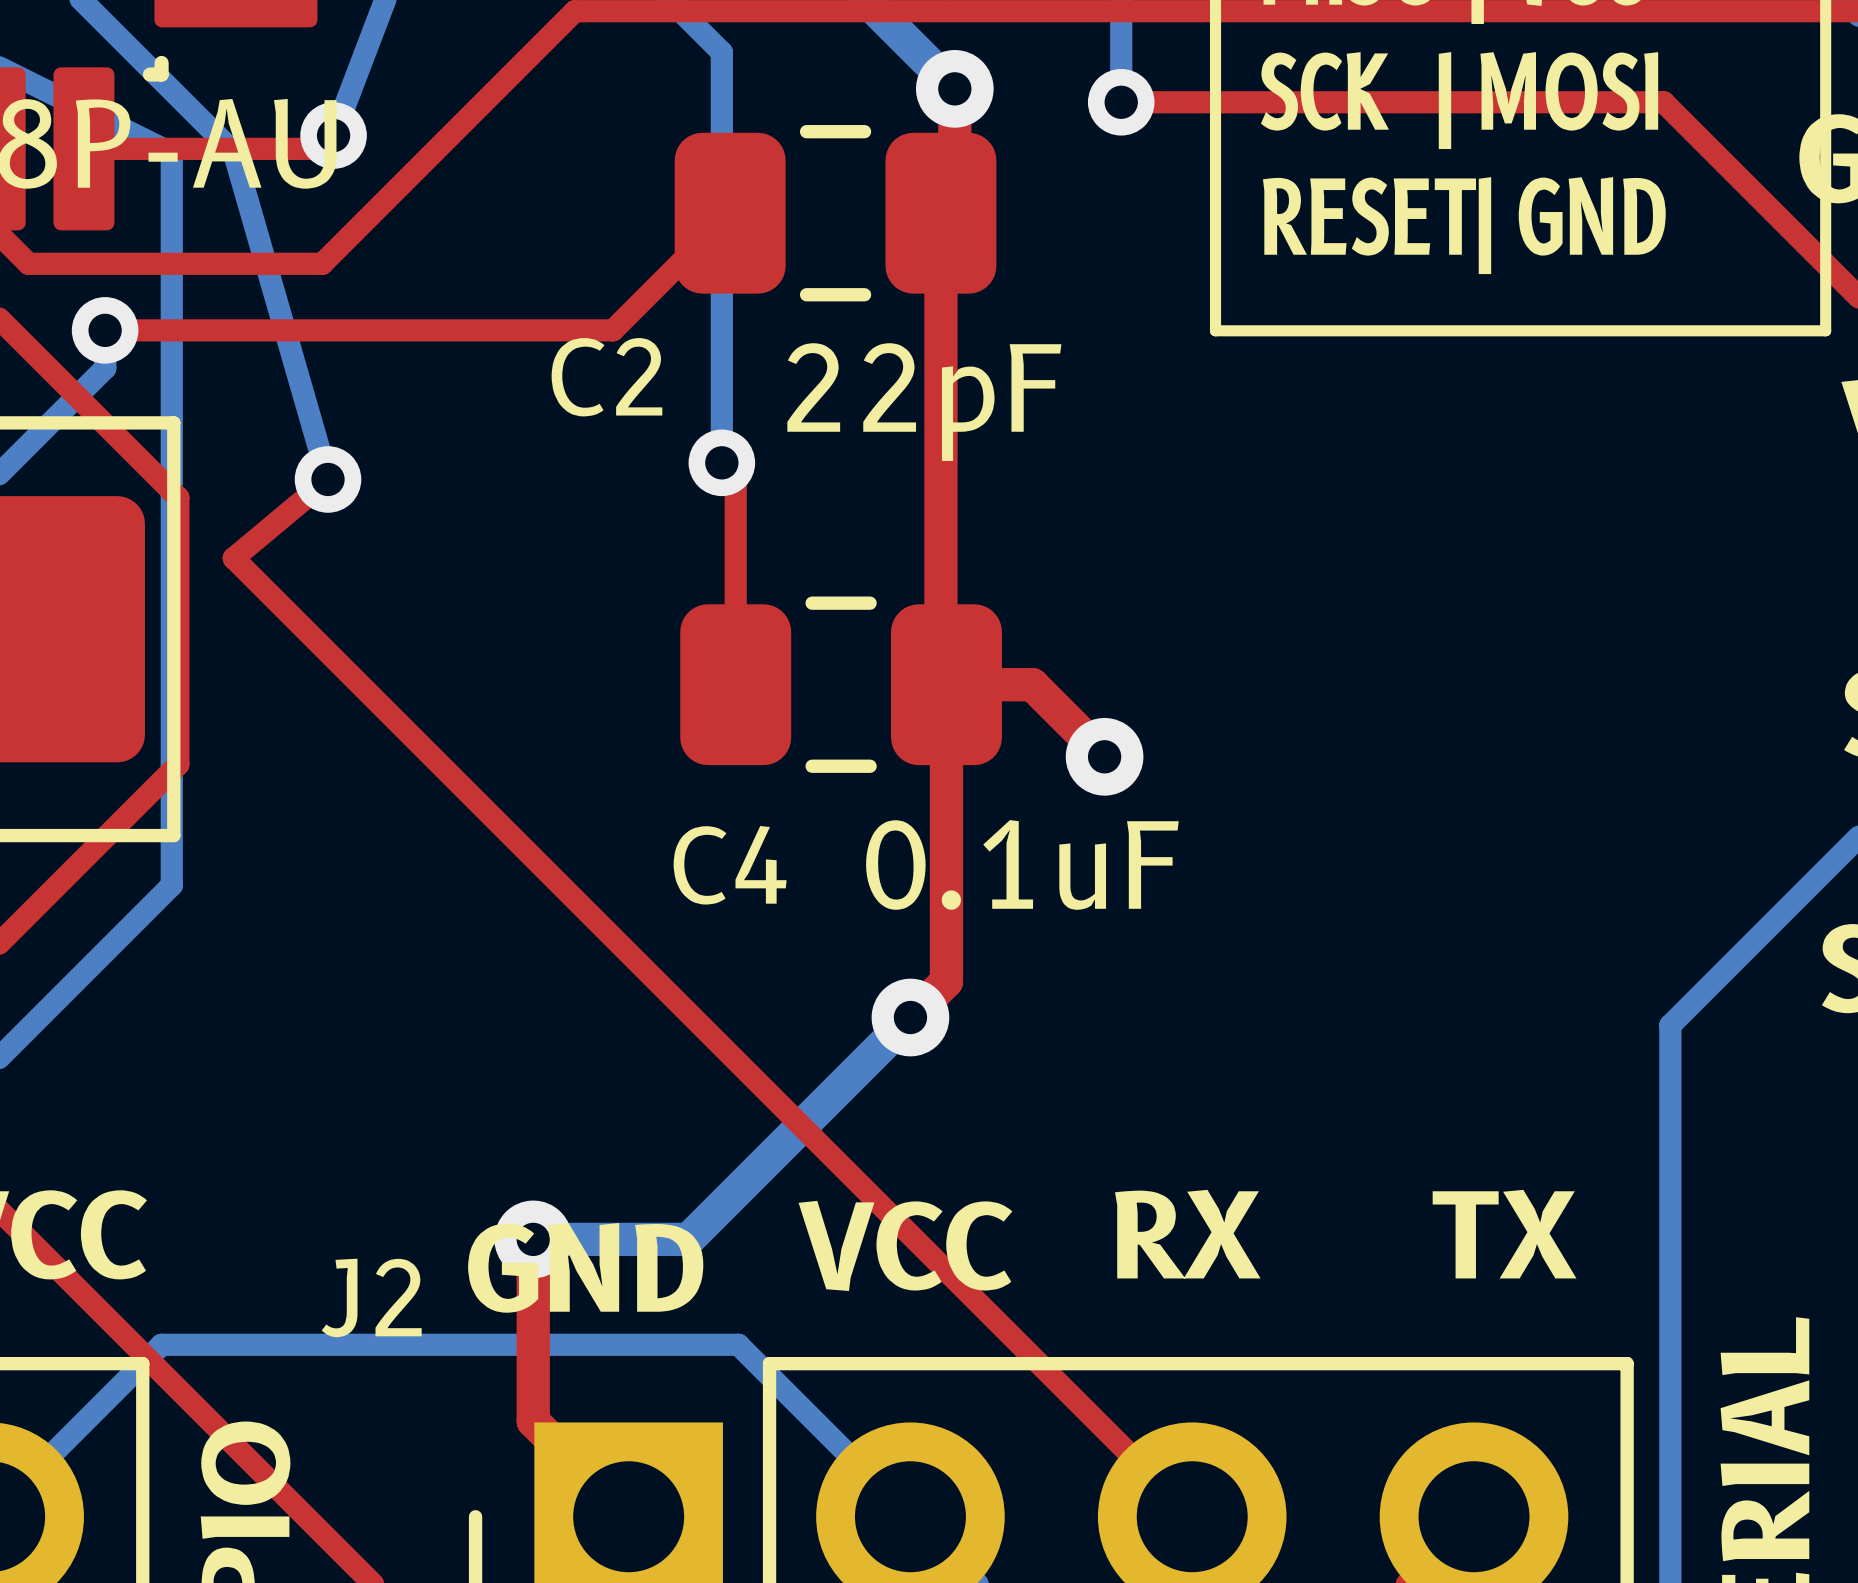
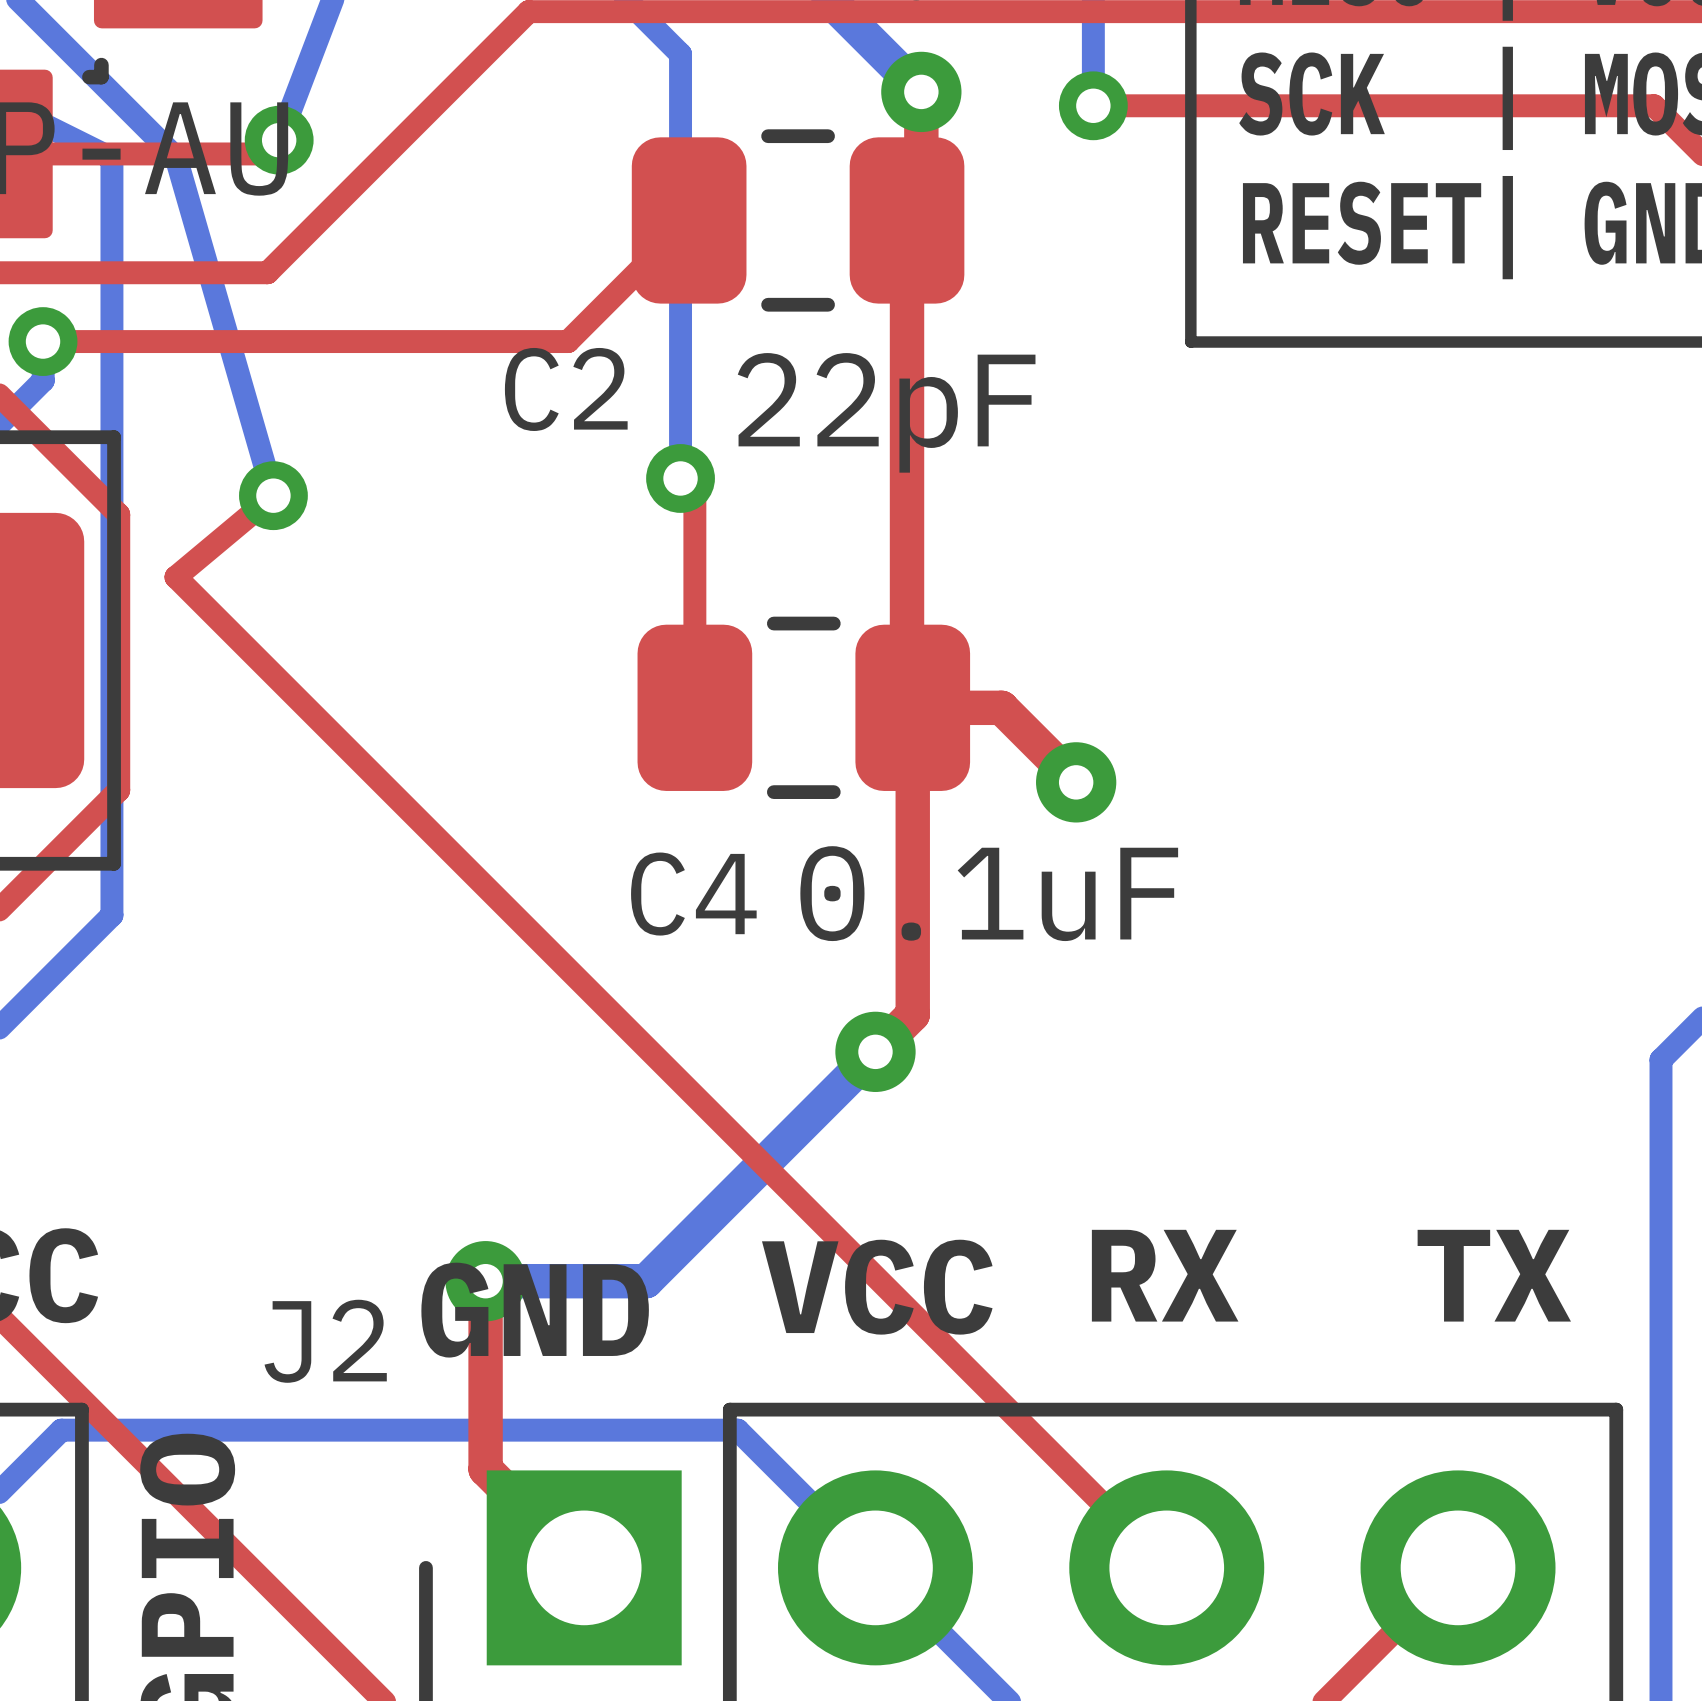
bottom track: (122, 1383) (161, 1344) (738, 1344) (777, 1383) -> (61, 1430) (737, 1430)

